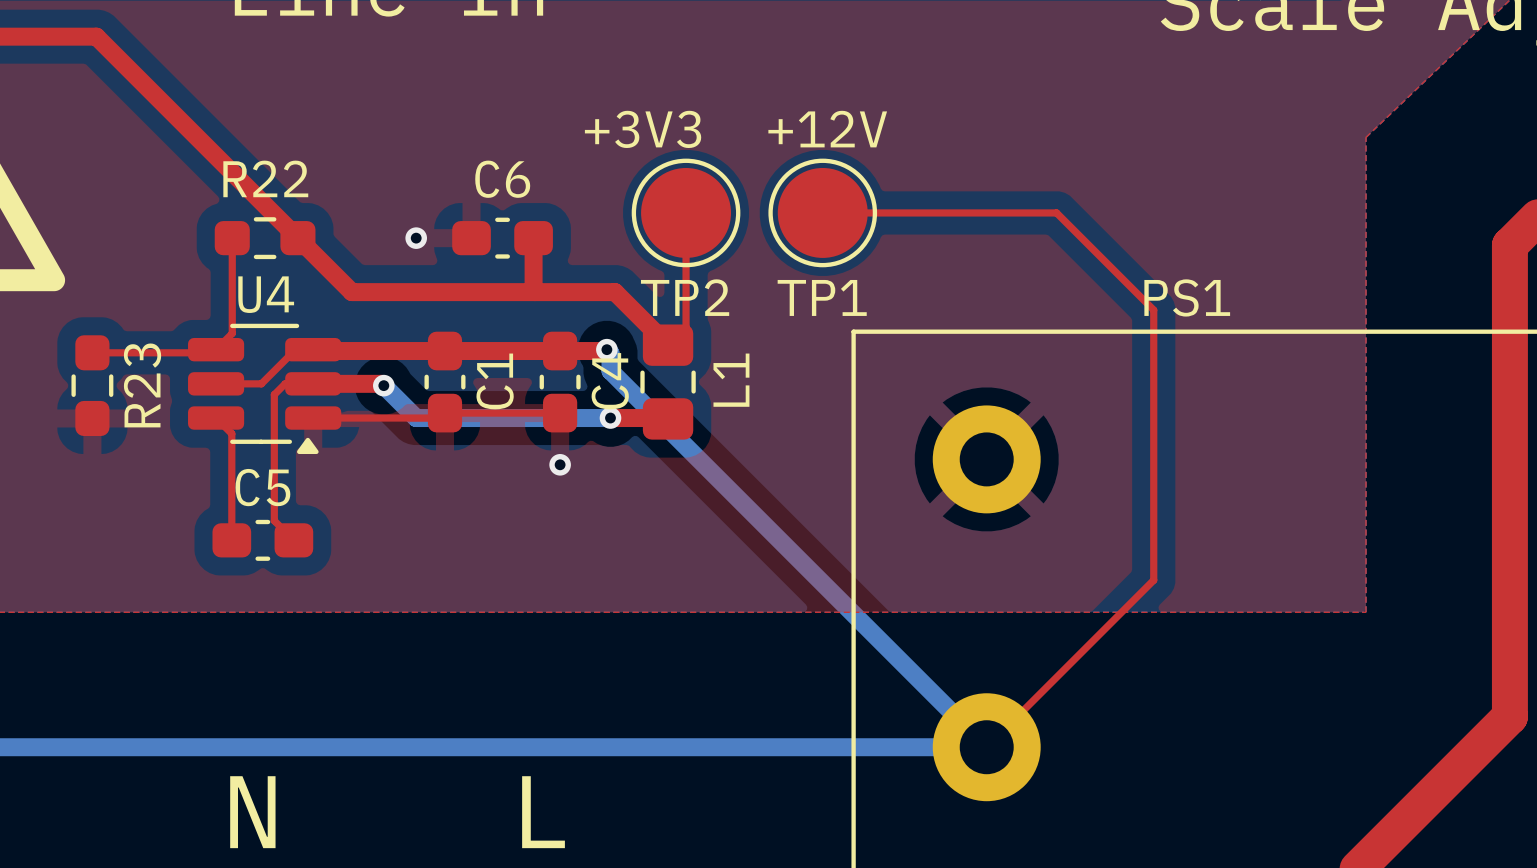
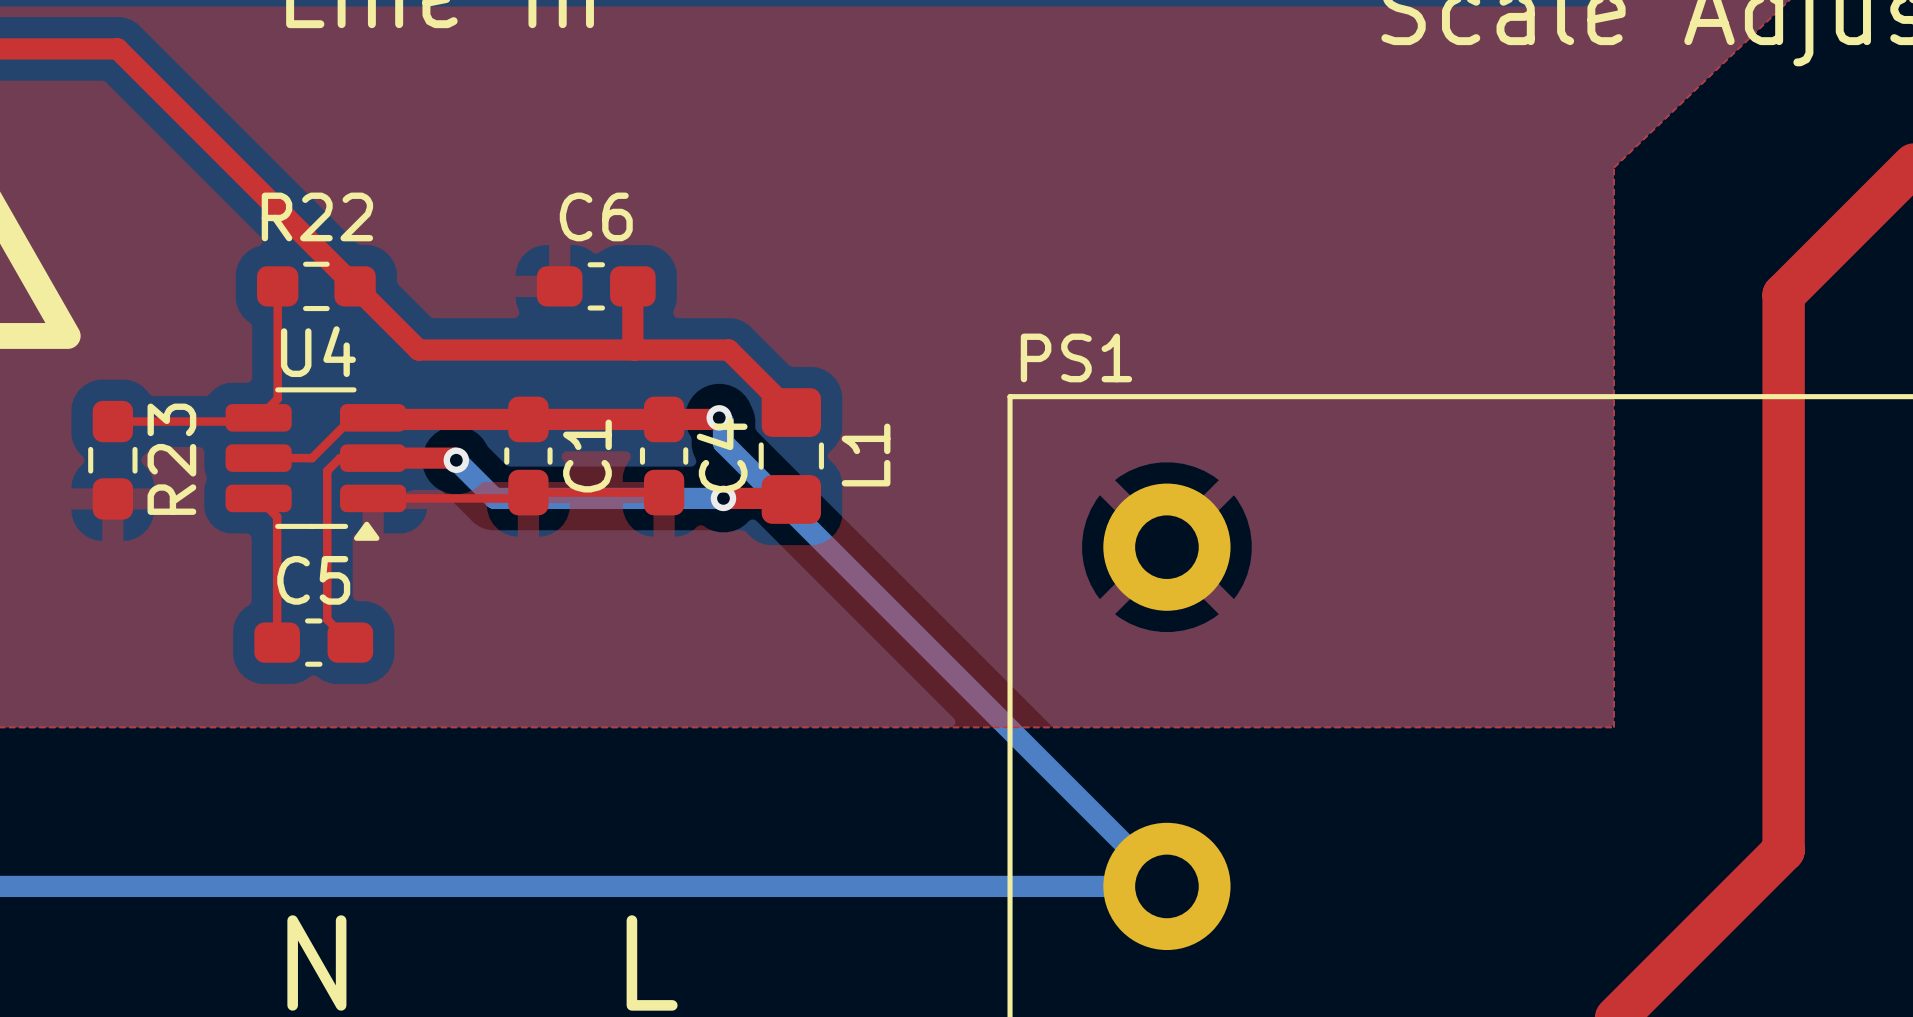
text: +3V3 (643, 129) -> none
text: +12V (827, 129) -> none
top track: (686, 212) (686, 327) (668, 345) -> none
TP2: (686, 212) -> none
top track: (822, 212) (1056, 212) (1153, 310) (1153, 580) (986, 747) -> none
TP1: (822, 212) -> none
via: (416, 238) -> none
PS1 name position: PS1 (1187, 297) -> PS1 (1076, 357)
via: (560, 464) -> none

